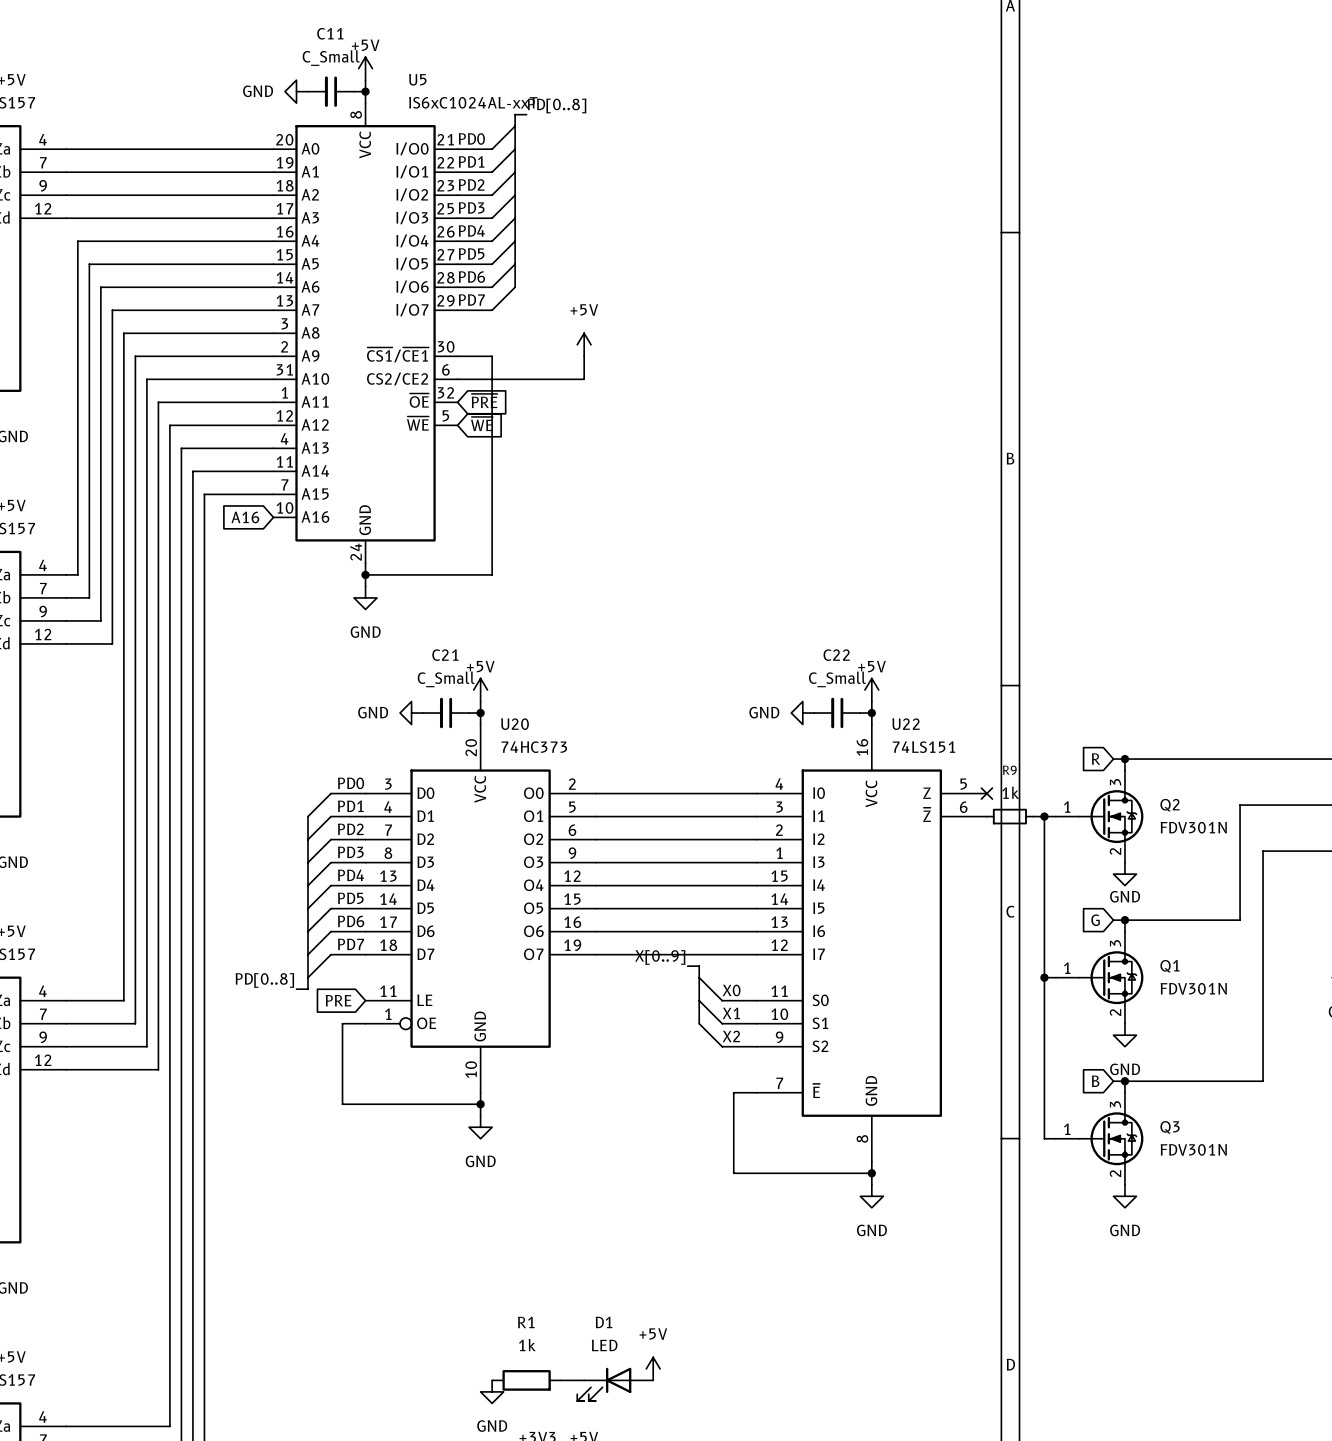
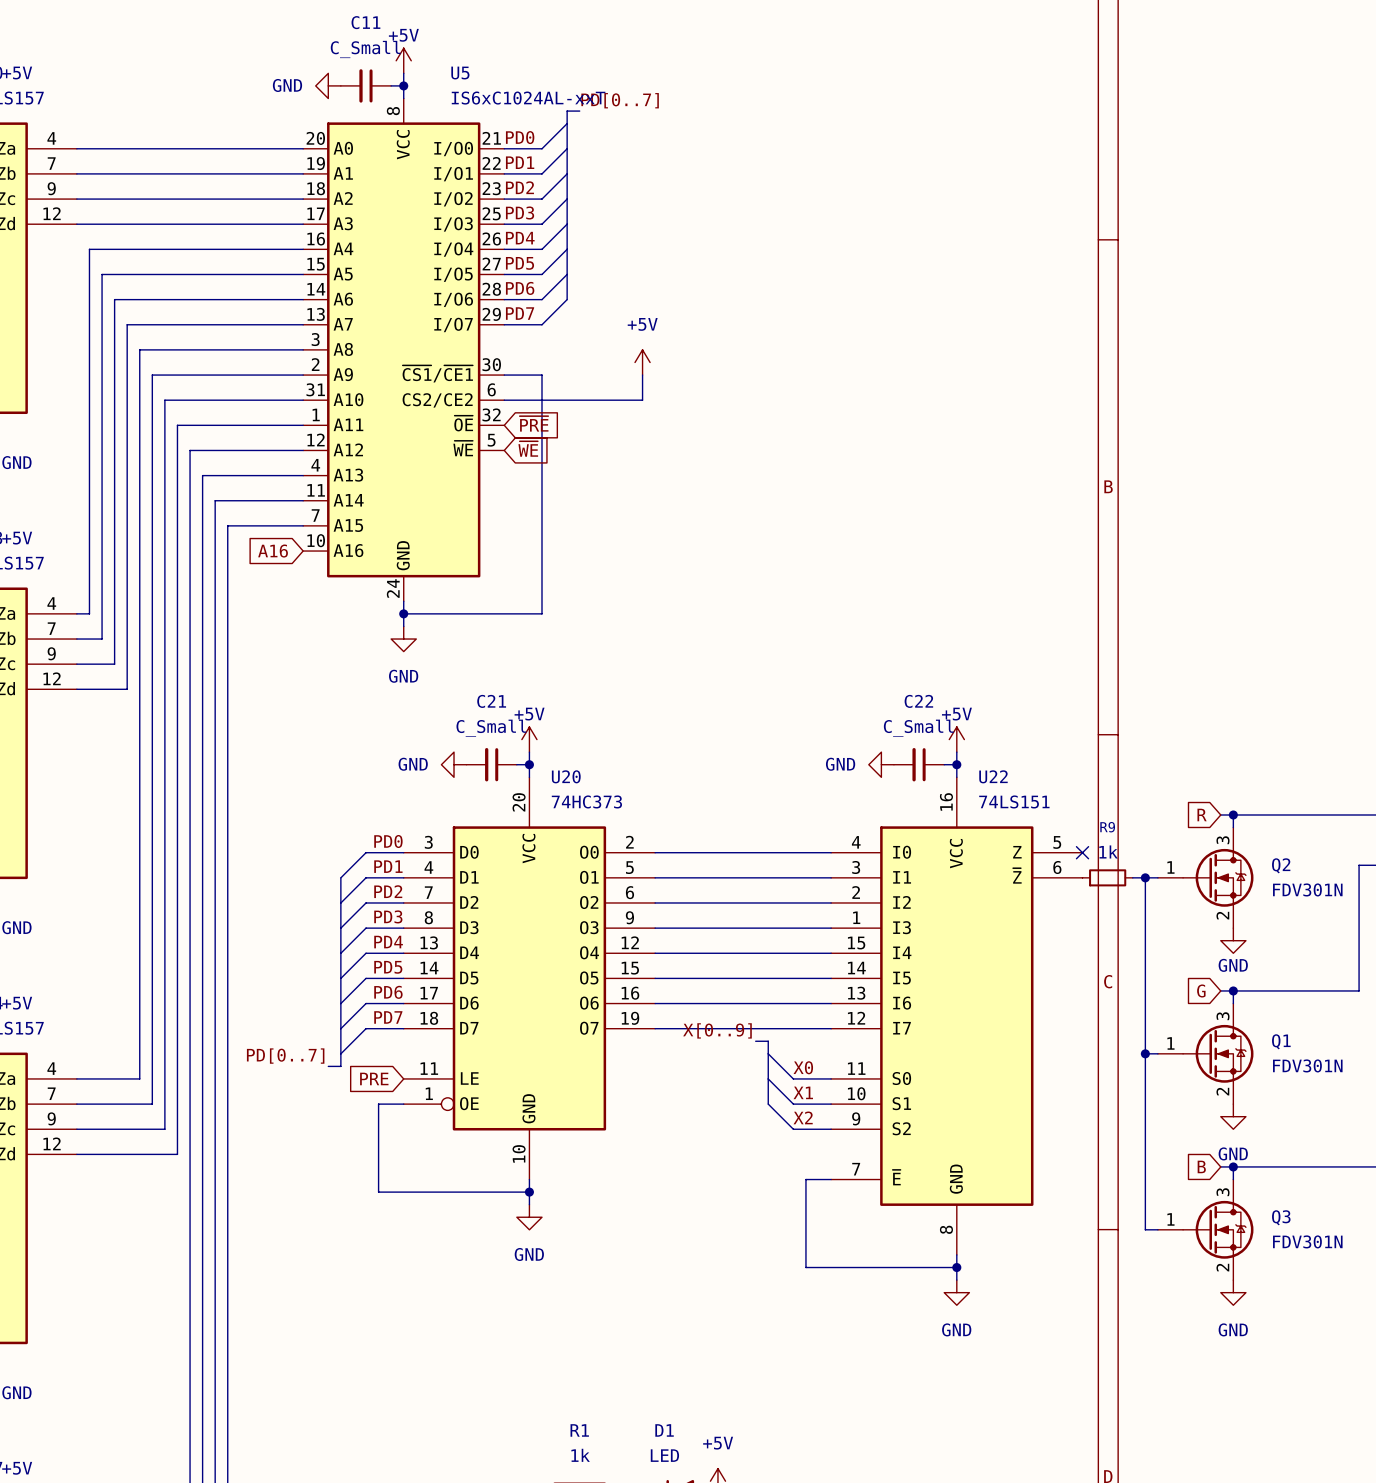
label: PD[0..8] (557, 105) -> PD[0..7] (620, 100)
label: PD[0..8] (264, 980) -> PD[0..7] (285, 1056)

